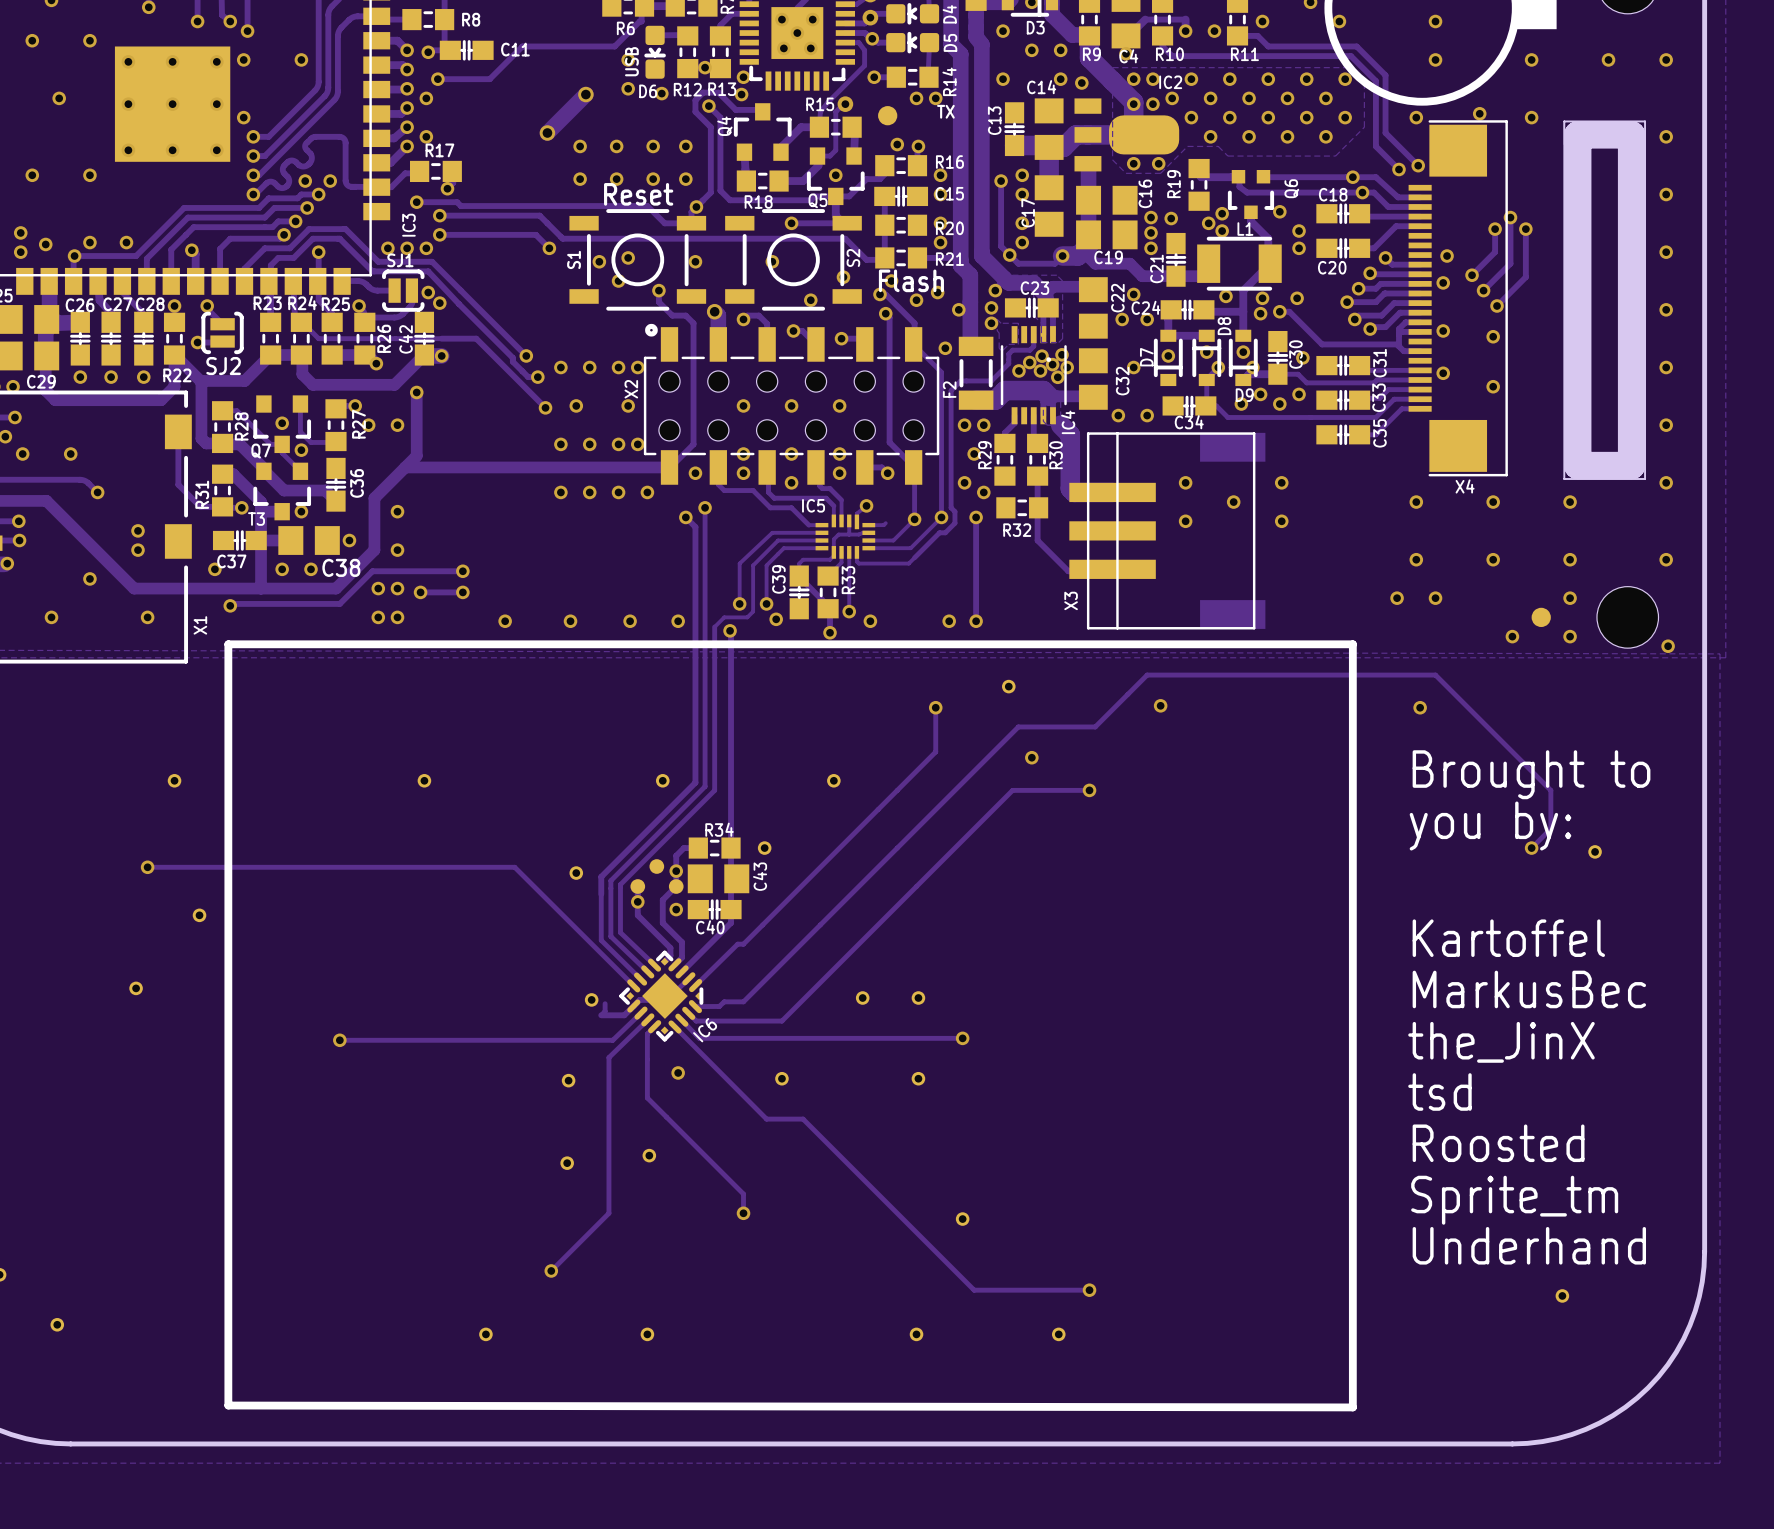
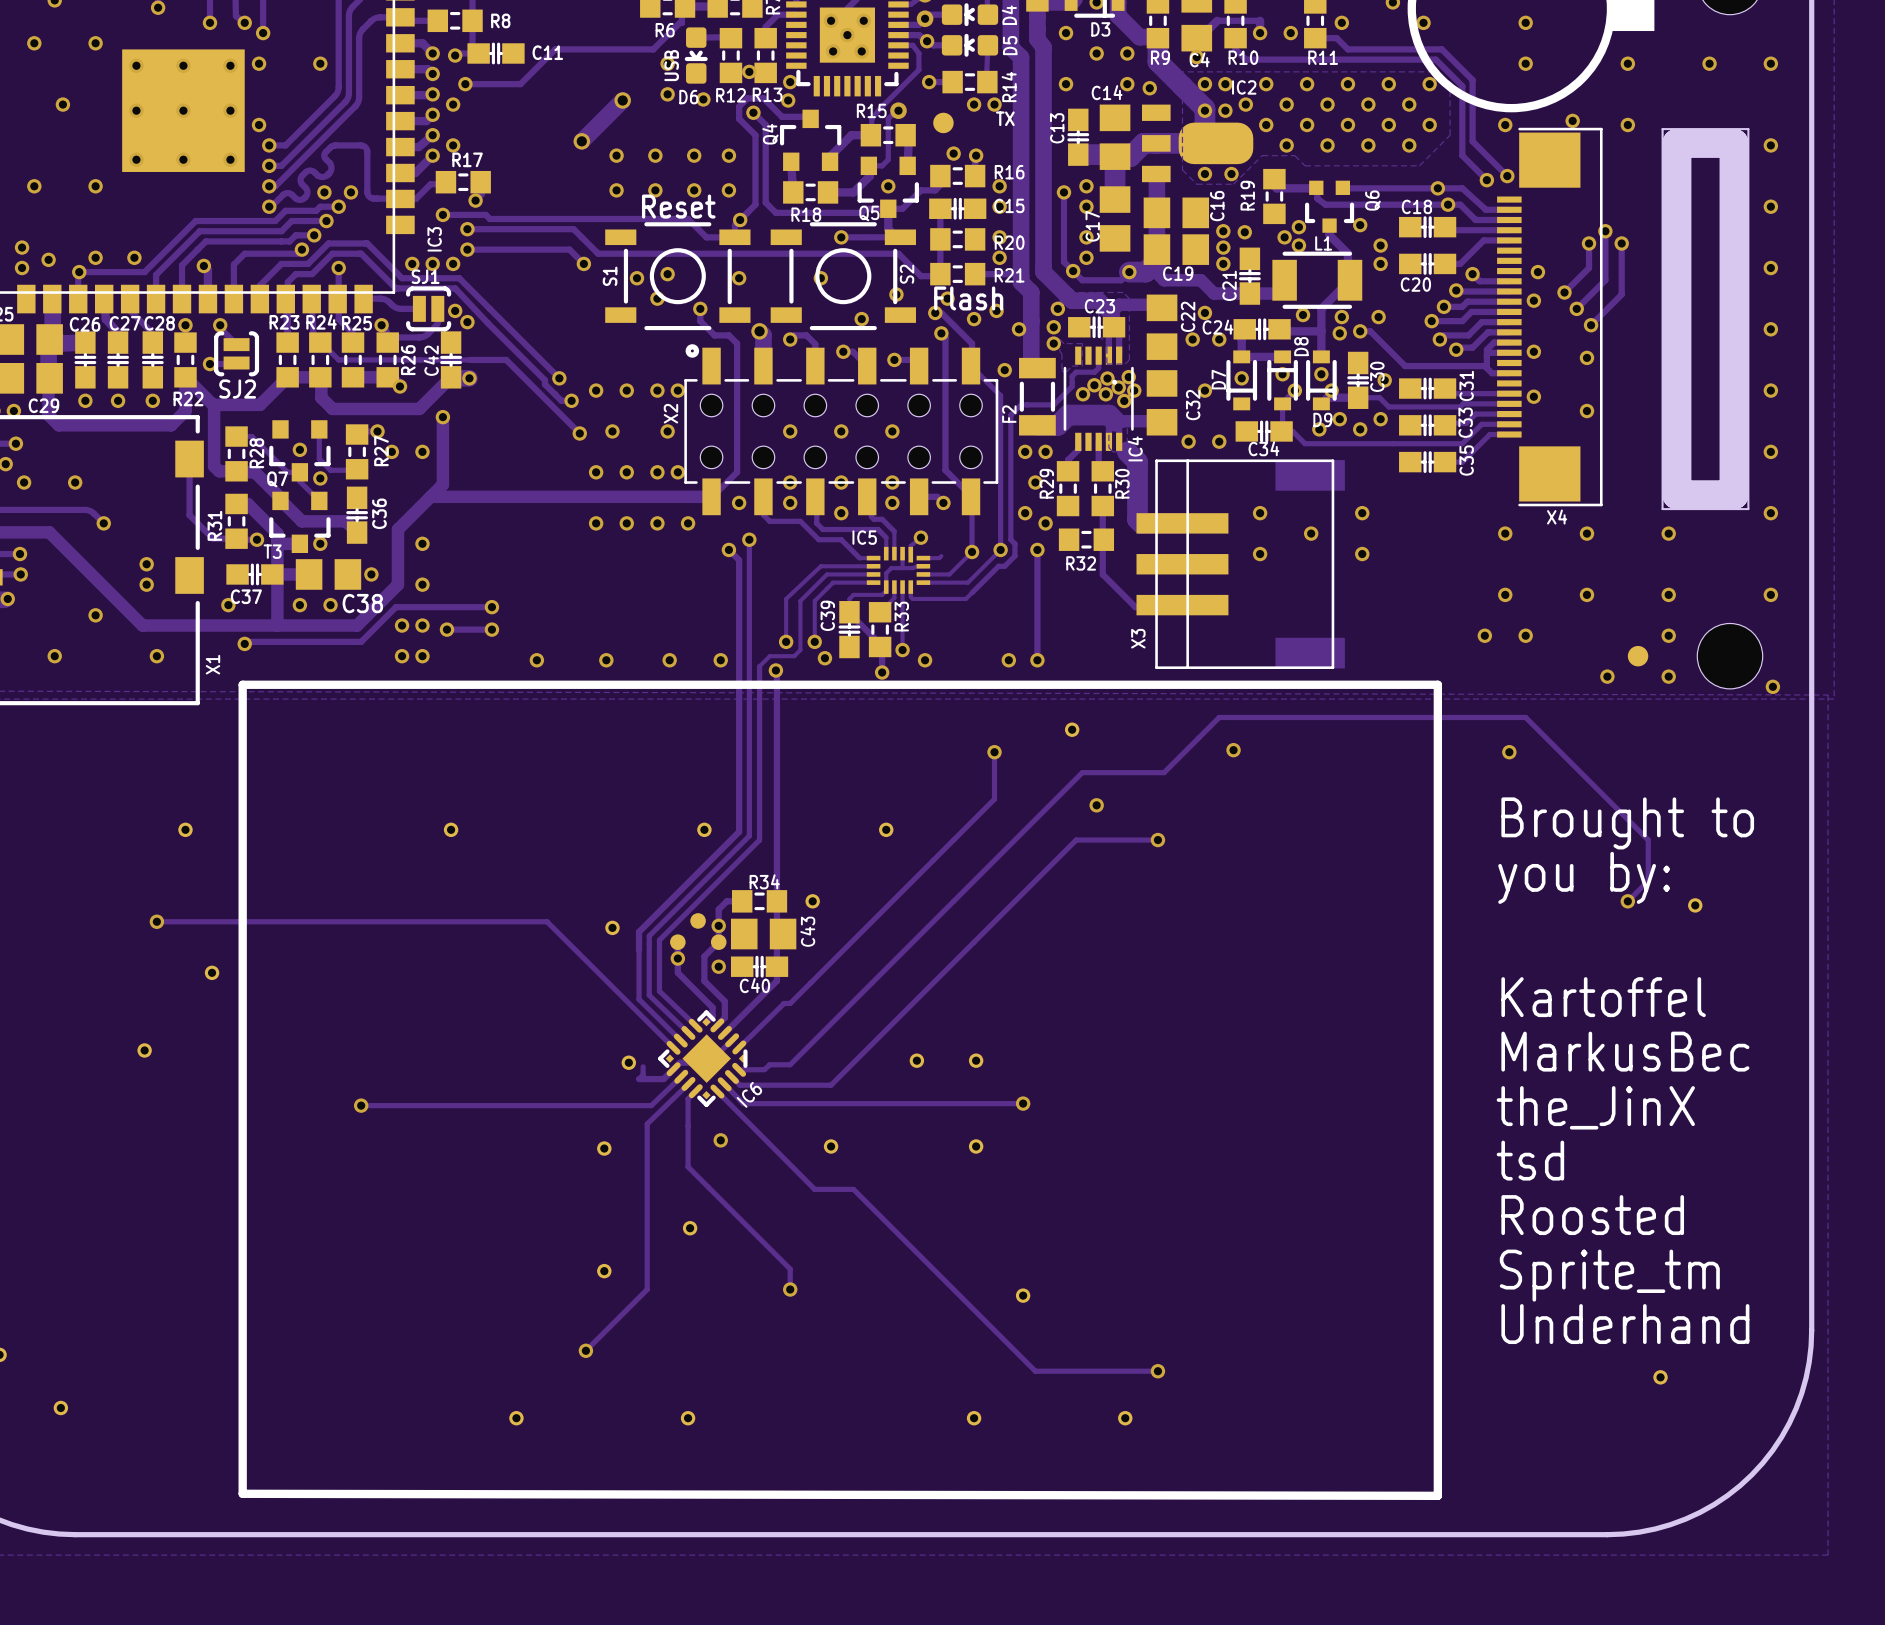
part position: (567, 1163) -> (604, 1271)

